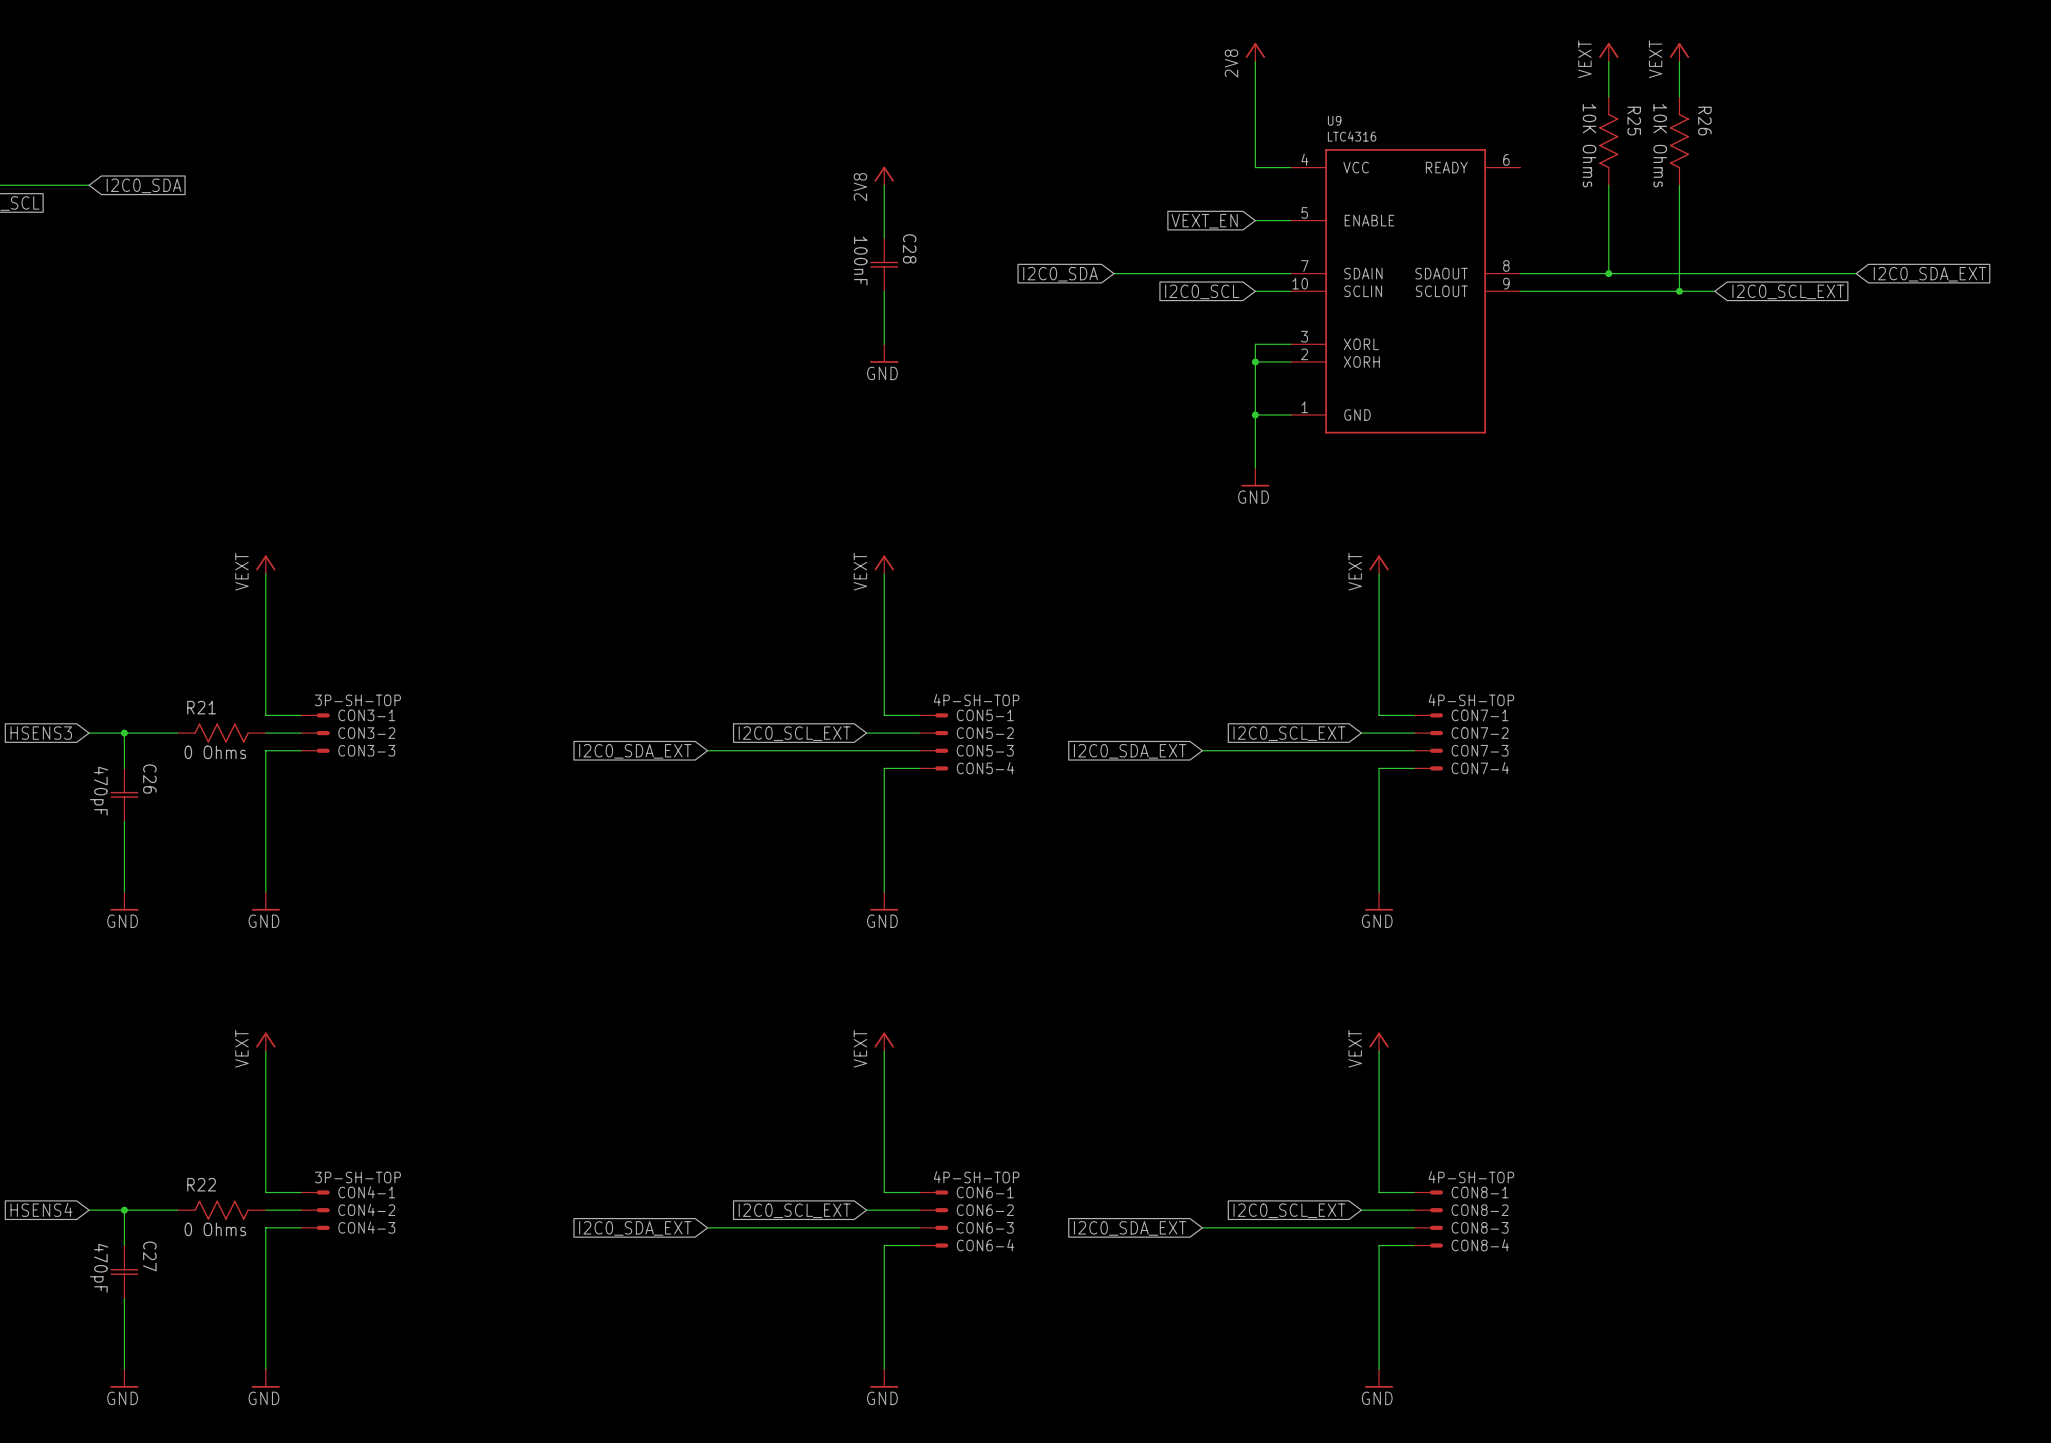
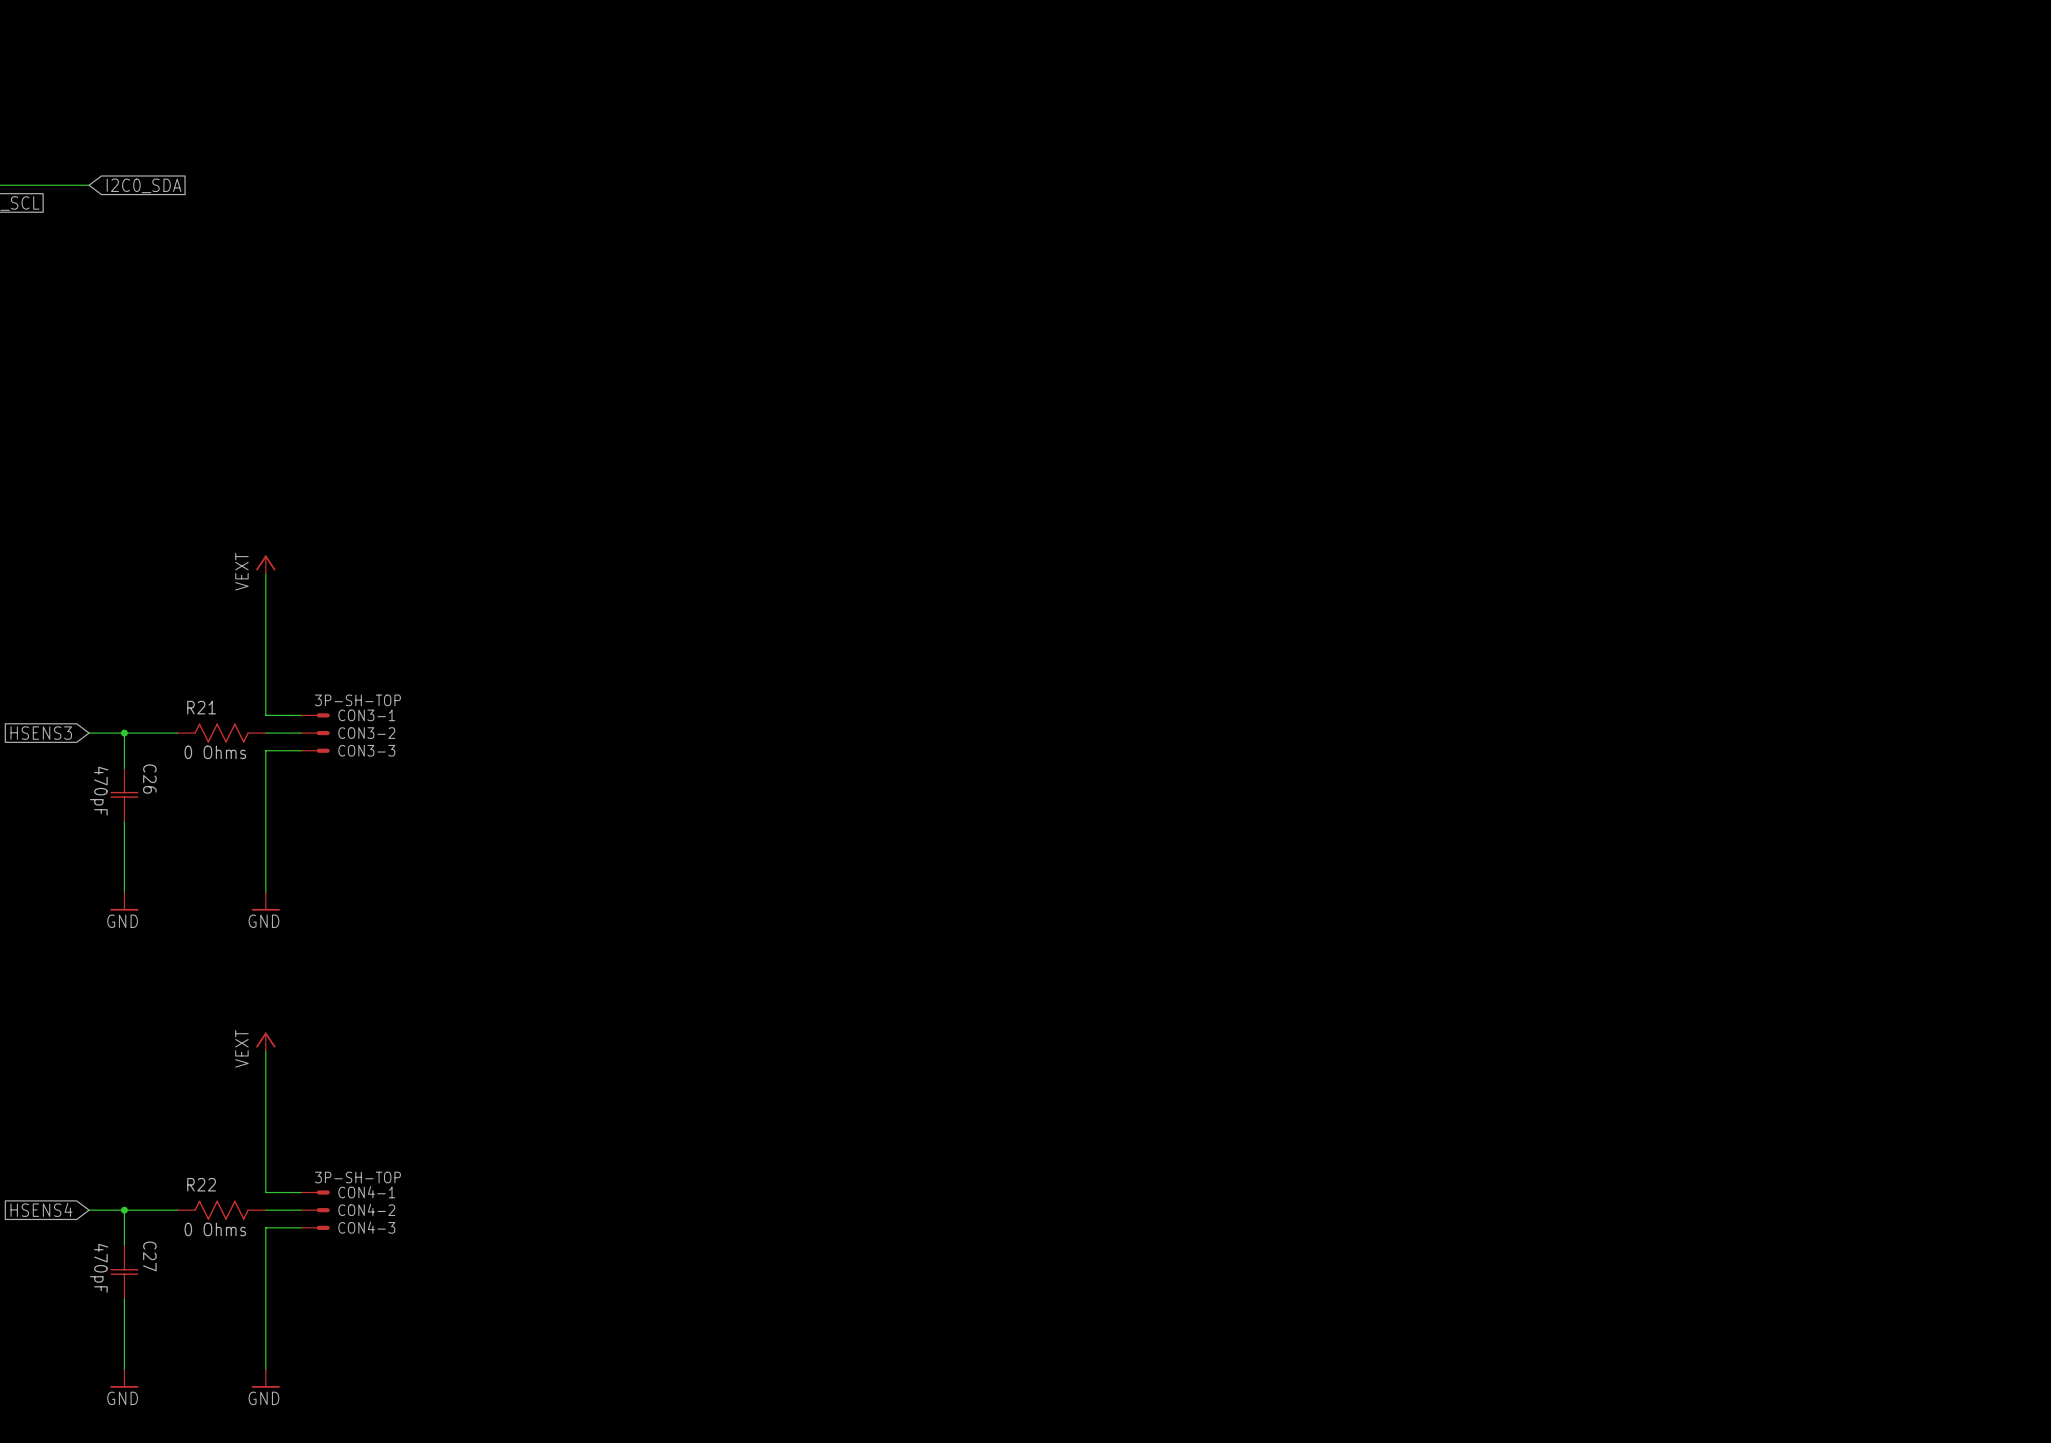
power symbol: 2V8 (1255, 52) -> none
power symbol: VEXT (1608, 52) -> none
power symbol: VEXT (1679, 52) -> none
wire: (1255, 61) (1255, 167) (1290, 167) -> none
wire: (1608, 61) (1608, 96) -> none
wire: (1679, 61) (1679, 96) -> none
R25: 10K Ohms (1608, 141) -> none
R26: 10K Ohms (1679, 141) -> none
power symbol: 2V8 (884, 175) -> none
wire: (884, 185) (884, 238) -> none
wire: (1608, 185) (1608, 273) -> none
wire: (1679, 185) (1679, 291) -> none
wire: (1255, 220) (1290, 220) -> none
global label: VEXT_EN (1204, 221) -> none
C28: 100nF (884, 264) -> none
wire: (1113, 273) (1290, 273) -> none
wire: (1520, 273) (1856, 273) -> none
junction: (1608, 273) -> none
global label: I2C0_SDA (1060, 274) -> none
global label: I2C0_SDA_EXT (1929, 274) -> none
wire: (884, 291) (884, 344) -> none
global label: I2C0_SCL (1202, 291) -> none
wire: (1255, 291) (1290, 291) -> none
U9: LTC4316 (1405, 291) -> none
wire: (1520, 291) (1714, 291) -> none
junction: (1679, 291) -> none
global label: I2C0_SCL_EXT (1788, 291) -> none
wire: (1290, 344) (1255, 344) (1255, 468) -> none
power symbol: GND (884, 353) -> none
wire: (1255, 361) (1290, 361) -> none
junction: (1255, 361) -> none
wire: (1255, 414) (1290, 414) -> none
junction: (1255, 414) -> none
power symbol: GND (1255, 477) -> none
power symbol: VEXT (884, 564) -> none
power symbol: VEXT (1379, 564) -> none
wire: (884, 574) (884, 715) (919, 715) -> none
wire: (1379, 574) (1379, 715) (1414, 715) -> none
CON5-1: 4P-SH-TOP (933, 715) -> none
CON7-1: 4P-SH-TOP (1428, 715) -> none
global label: I2C0_SCL_EXT (794, 733) -> none
wire: (866, 733) (919, 733) -> none
CON5-2: (933, 733) -> none
global label: I2C0_SCL_EXT (1289, 733) -> none
wire: (1361, 733) (1414, 733) -> none
CON7-2: (1428, 733) -> none
wire: (707, 750) (919, 750) -> none
CON5-3: (933, 750) -> none
wire: (1202, 750) (1414, 750) -> none
CON7-3: (1428, 750) -> none
global label: I2C0_SDA_EXT (635, 751) -> none
global label: I2C0_SDA_EXT (1130, 751) -> none
wire: (919, 768) (884, 768) (884, 892) -> none
CON5-4: (933, 768) -> none
wire: (1414, 768) (1379, 768) (1379, 892) -> none
CON7-4: (1428, 768) -> none
power symbol: GND (884, 901) -> none
power symbol: GND (1379, 901) -> none
power symbol: VEXT (884, 1041) -> none
power symbol: VEXT (1379, 1041) -> none
wire: (884, 1051) (884, 1192) (919, 1192) -> none
wire: (1379, 1051) (1379, 1192) (1414, 1192) -> none
CON6-1: 4P-SH-TOP (933, 1192) -> none
CON8-1: 4P-SH-TOP (1428, 1192) -> none
global label: I2C0_SCL_EXT (794, 1210) -> none
wire: (866, 1210) (919, 1210) -> none
CON6-2: (933, 1210) -> none
global label: I2C0_SCL_EXT (1289, 1210) -> none
wire: (1361, 1210) (1414, 1210) -> none
CON8-2: (1428, 1210) -> none
wire: (707, 1227) (919, 1227) -> none
CON6-3: (933, 1227) -> none
wire: (1202, 1227) (1414, 1227) -> none
CON8-3: (1428, 1227) -> none
global label: I2C0_SDA_EXT (635, 1228) -> none
global label: I2C0_SDA_EXT (1130, 1228) -> none
wire: (919, 1245) (884, 1245) (884, 1369) -> none
CON6-4: (933, 1245) -> none
wire: (1414, 1245) (1379, 1245) (1379, 1369) -> none
CON8-4: (1428, 1245) -> none
power symbol: GND (884, 1378) -> none
power symbol: GND (1379, 1378) -> none

